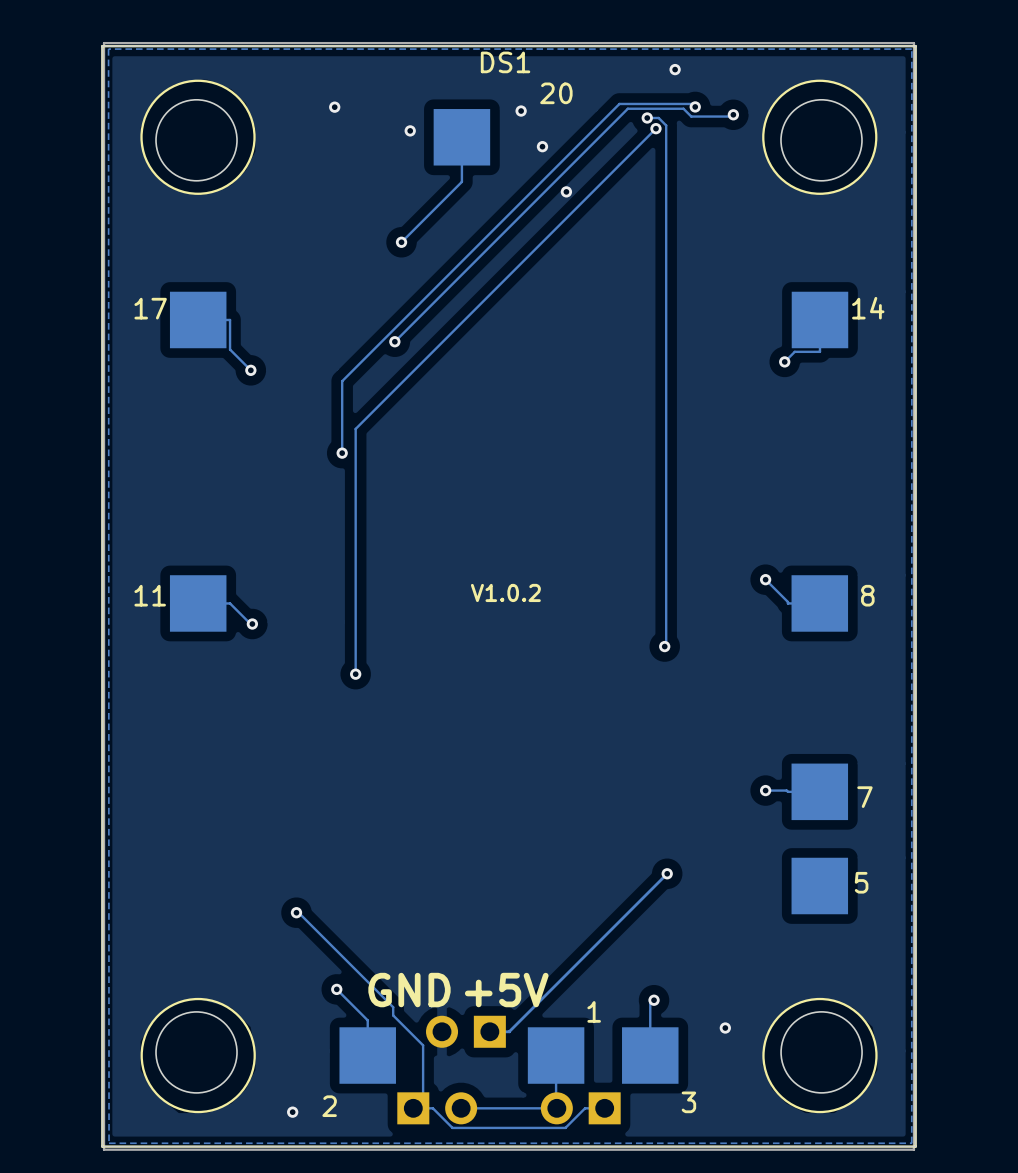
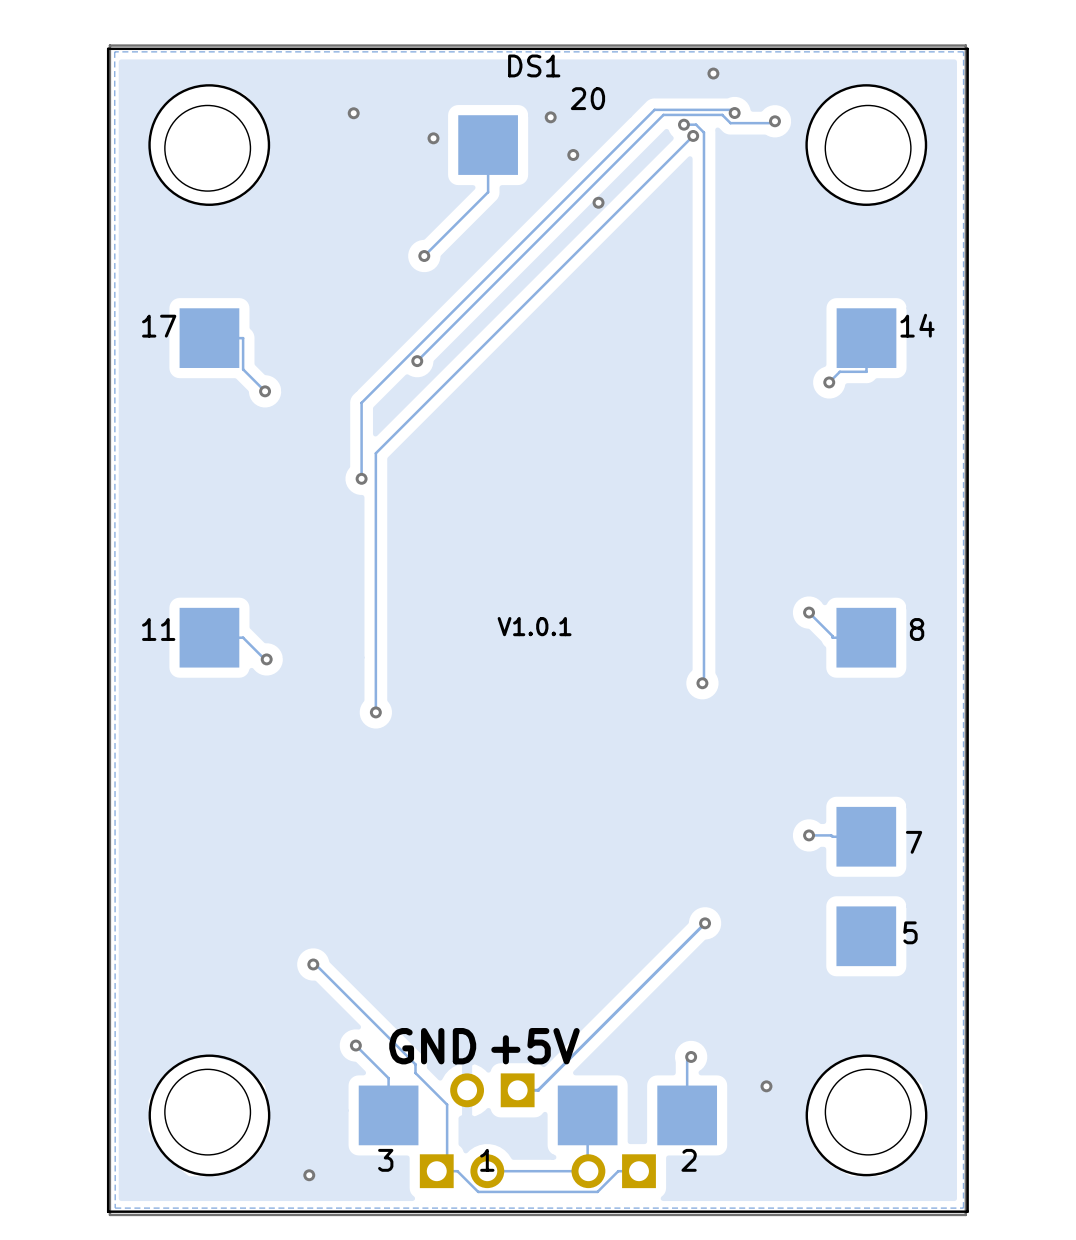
text: V1.0.2 (505, 592) -> V1.0.1 (534, 626)
DS1 text position: 1 (594, 1011) -> 1 (487, 1160)
DS1 text position: 3 (688, 1102) -> 3 (385, 1160)
DS1 text position: 2 (329, 1106) -> 2 (689, 1160)

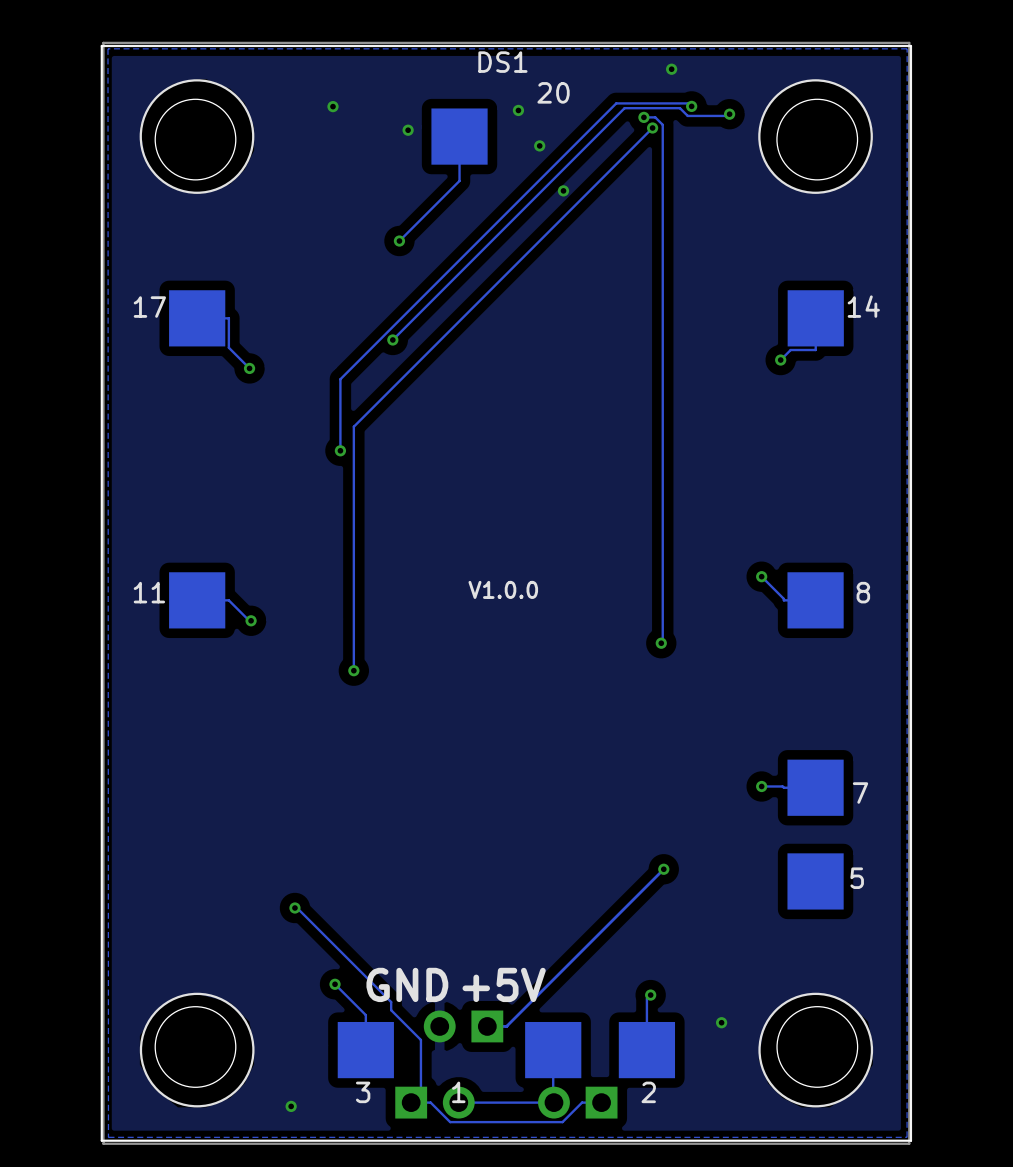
text: V1.0.1 (534, 626) -> V1.0.0 (503, 589)

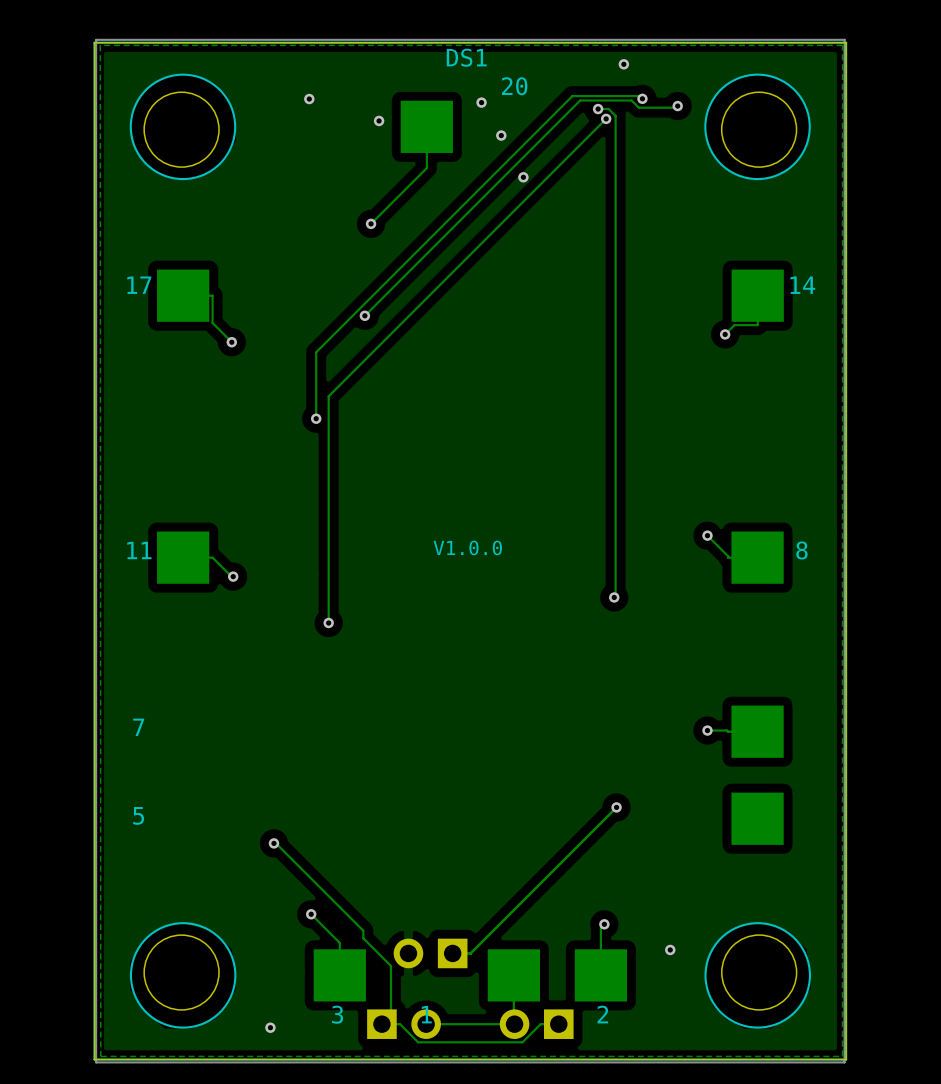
DS1 text position: 7 (860, 793) -> 7 (138, 727)
DS1 text position: 5 (857, 878) -> 5 (138, 815)
text: GND (407, 984) -> none
text: +5V (504, 984) -> none

